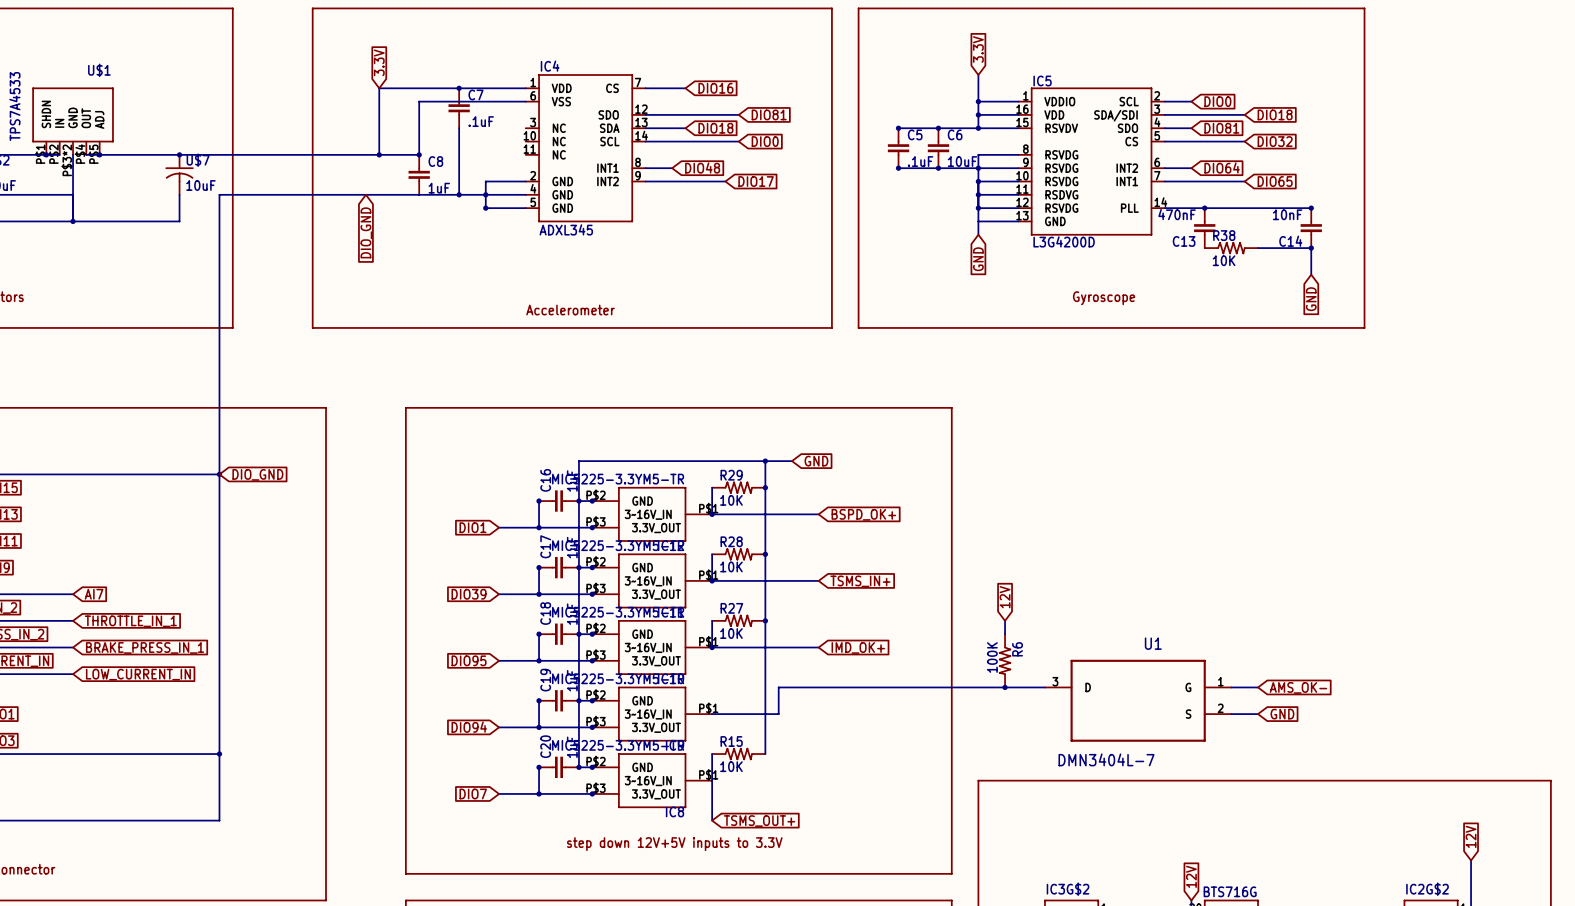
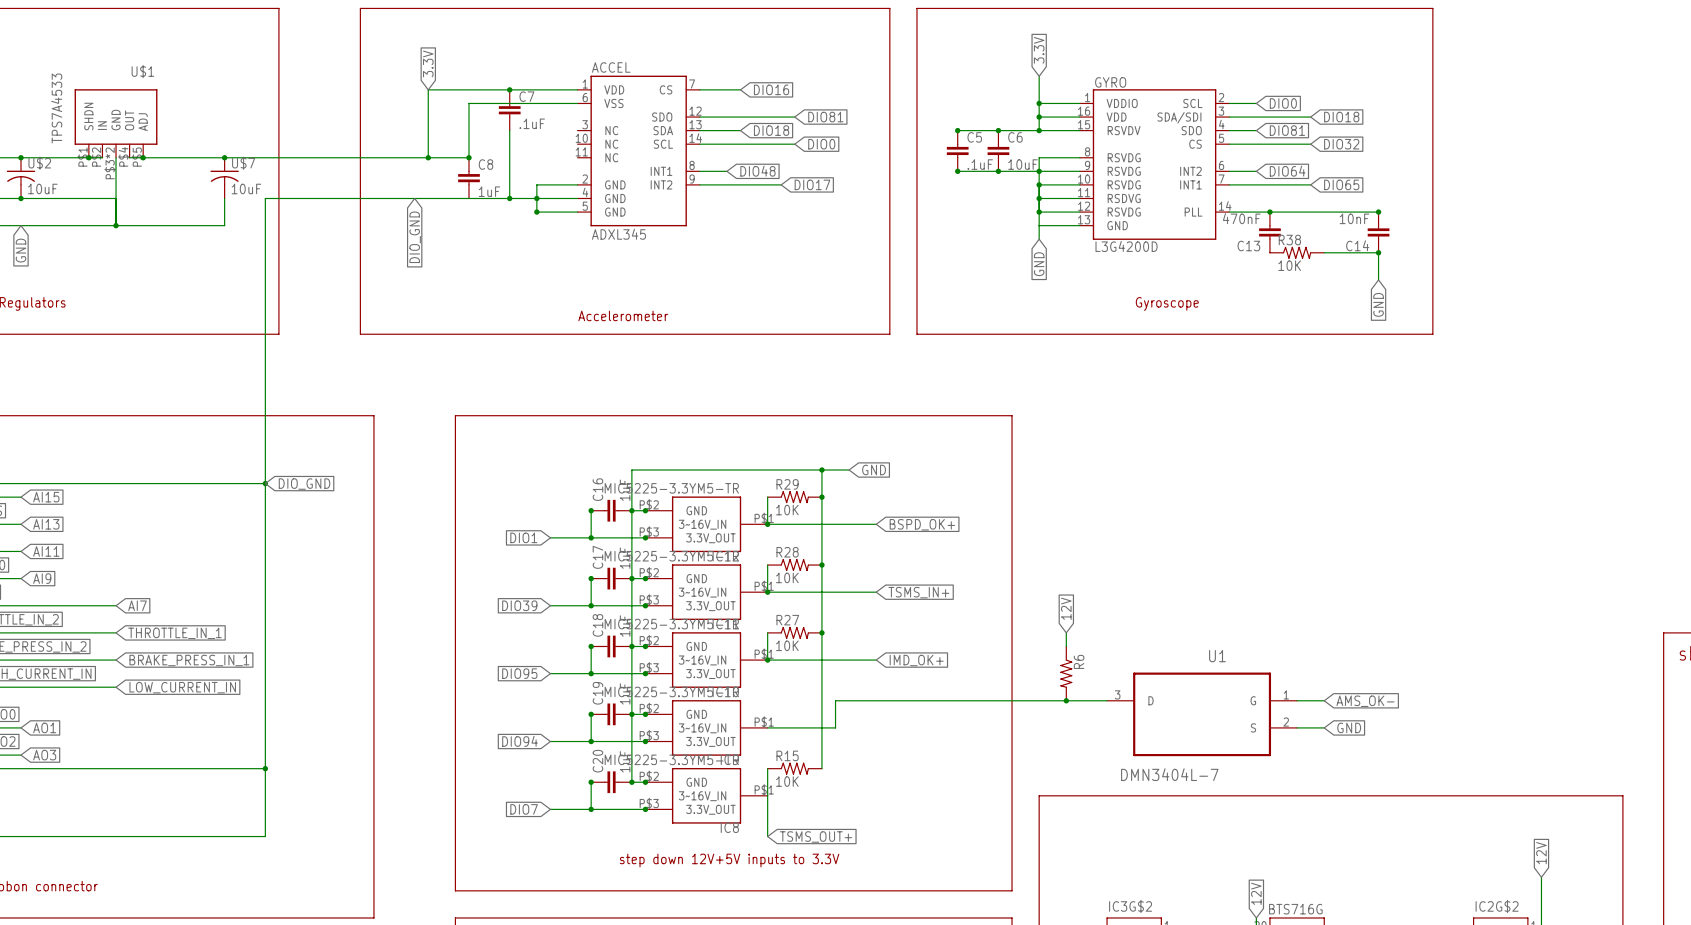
IC4 name: IC4 (550, 66) -> ACCEL (611, 67)
IC5 name: IC5 (1042, 80) -> GYRO (1110, 82)
R6 value: 100K (992, 657) -> none

